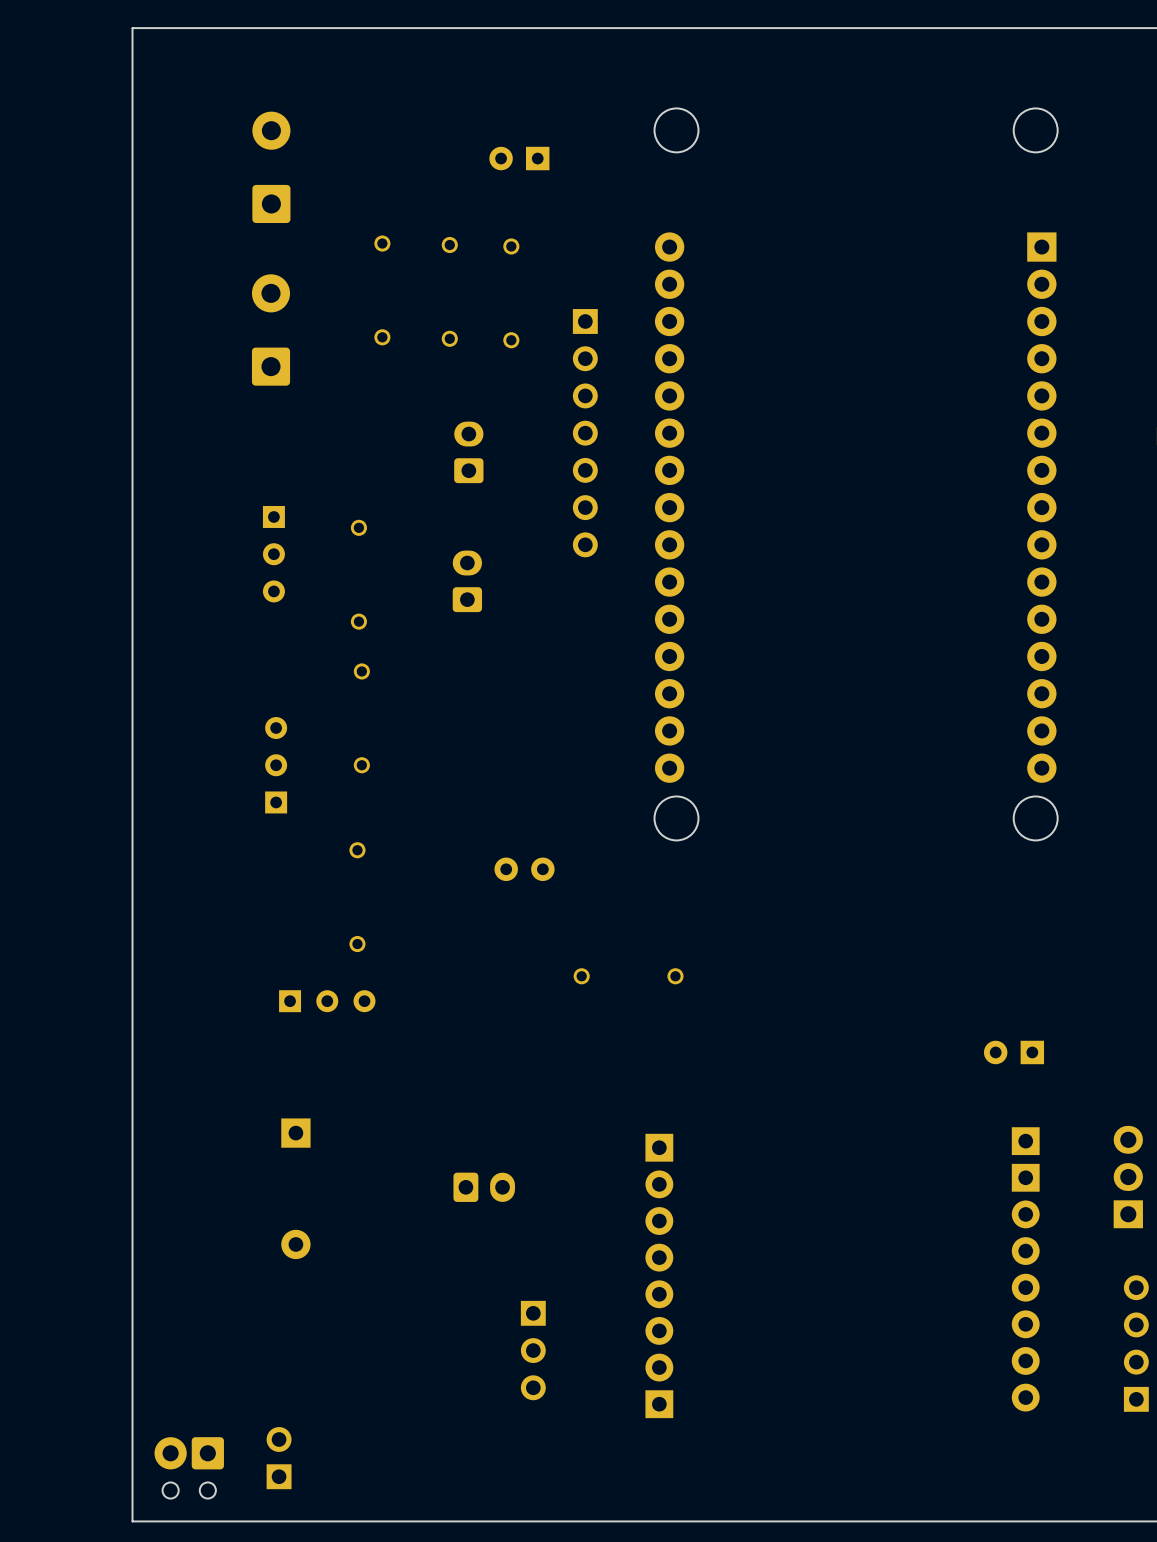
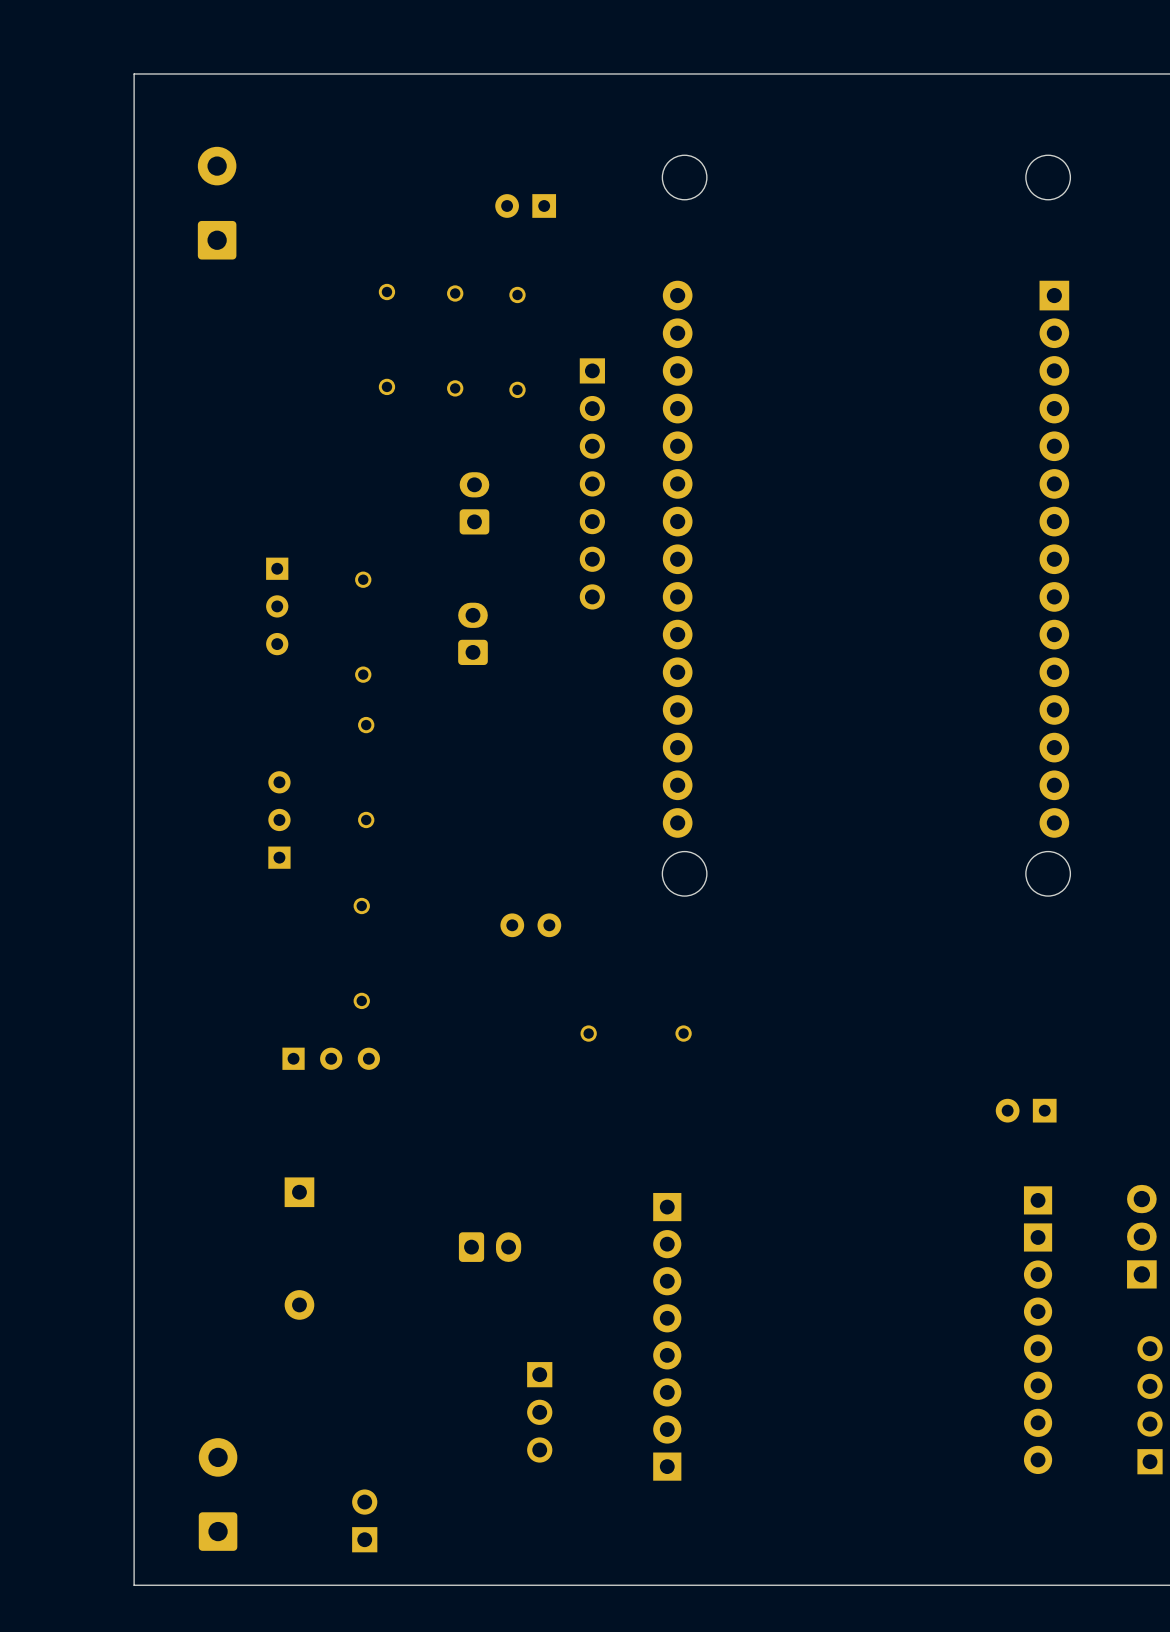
part position: (271, 167) -> (217, 203)
part: (271, 329) -> none
part: none -> (218, 1494)
part position: (279, 1458) -> (364, 1520)
part: (189, 1467) -> none

